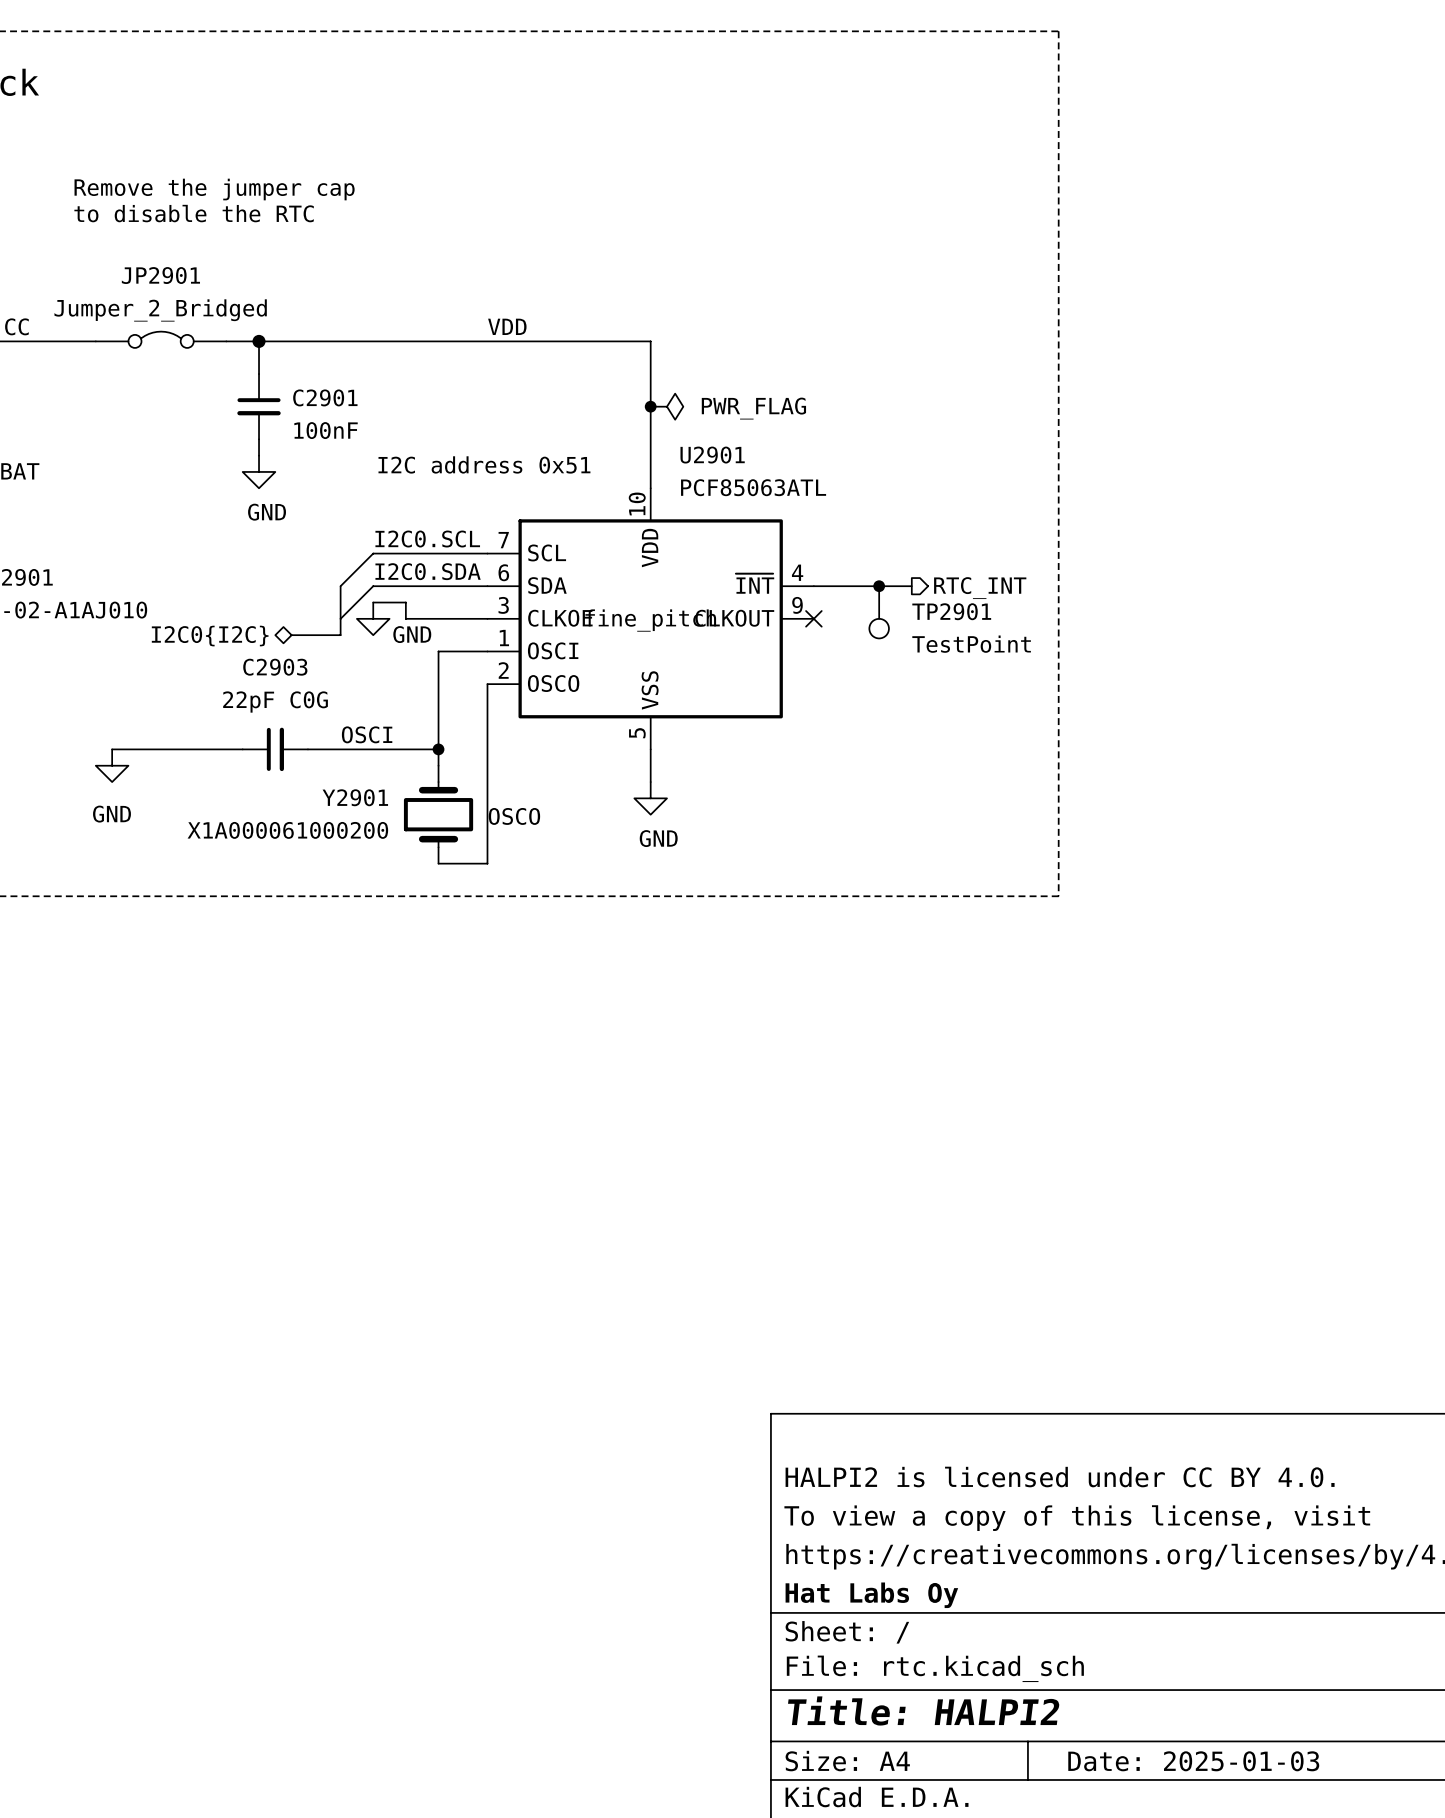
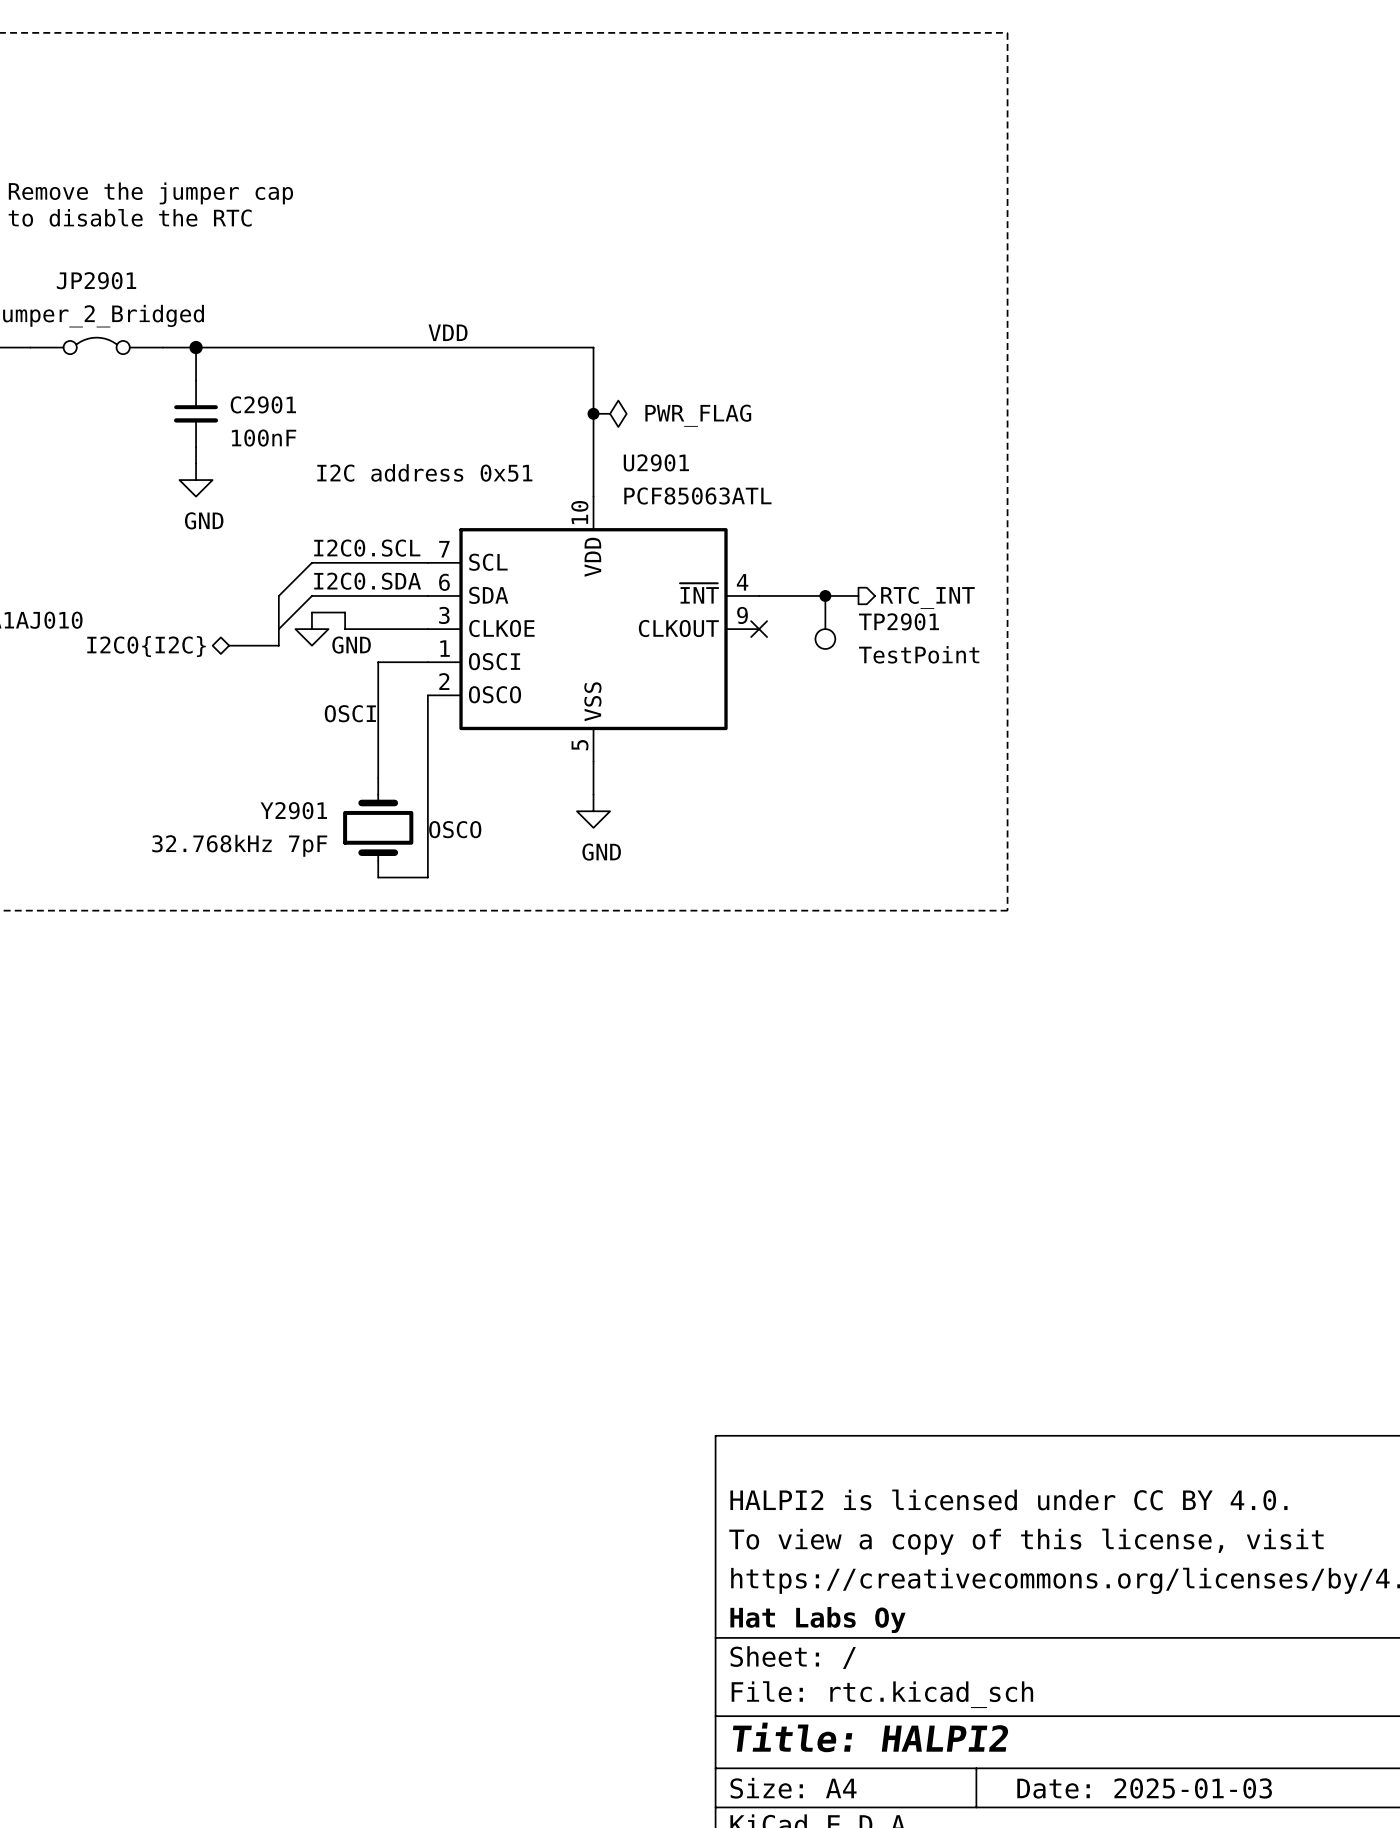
U2901 text: fine_pitch (650, 620) -> none
label position: OSCI (367, 734) -> OSCI (350, 713)
wire: (112, 749) (242, 749) -> none
C2903: 22pF C0G (275, 749) -> none
wire: (307, 749) (438, 749) -> none
junction: (438, 749) -> none
power symbol: GND (112, 765) -> none
Y2901 value: X1A000061000200 (287, 830) -> 32.768kHz 7pF (239, 845)

